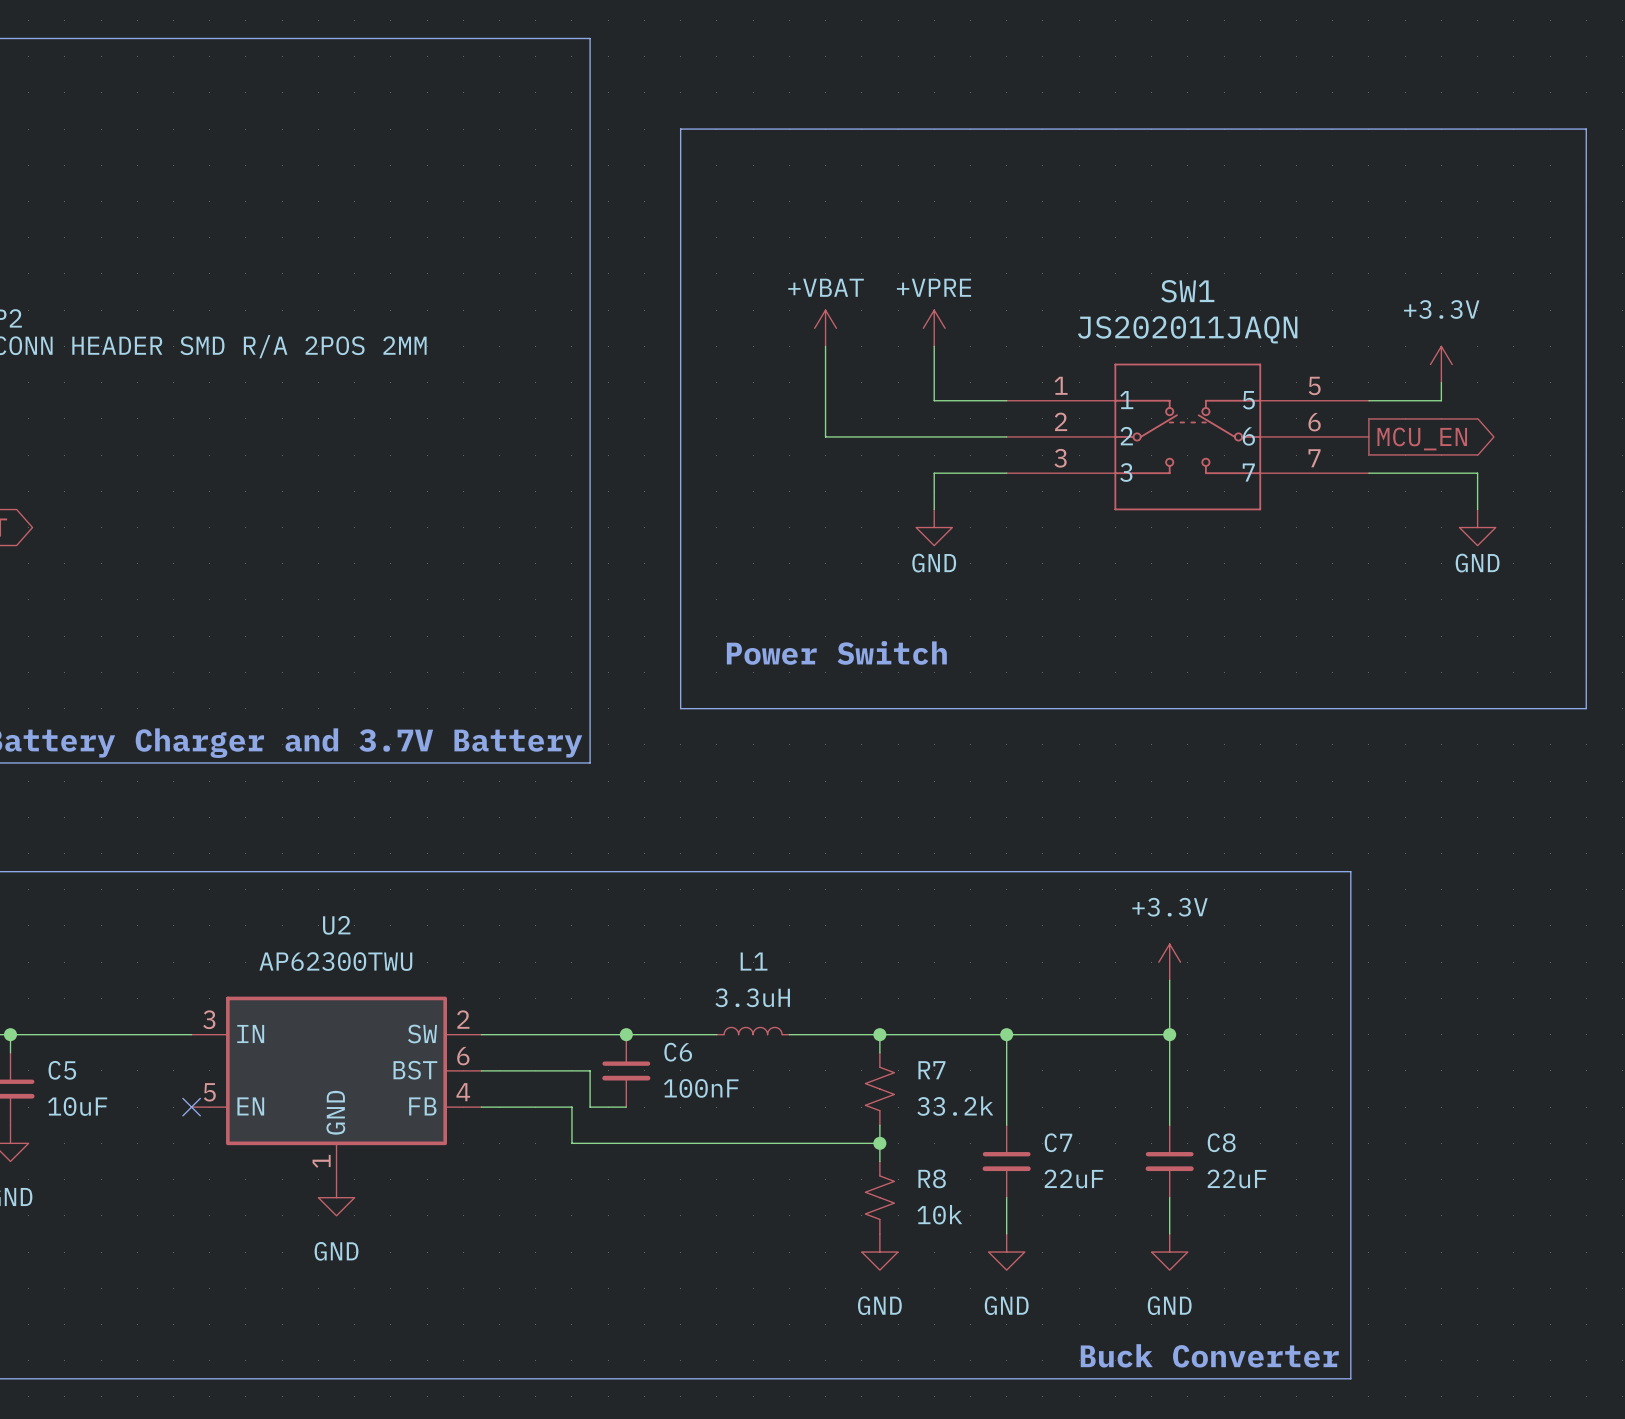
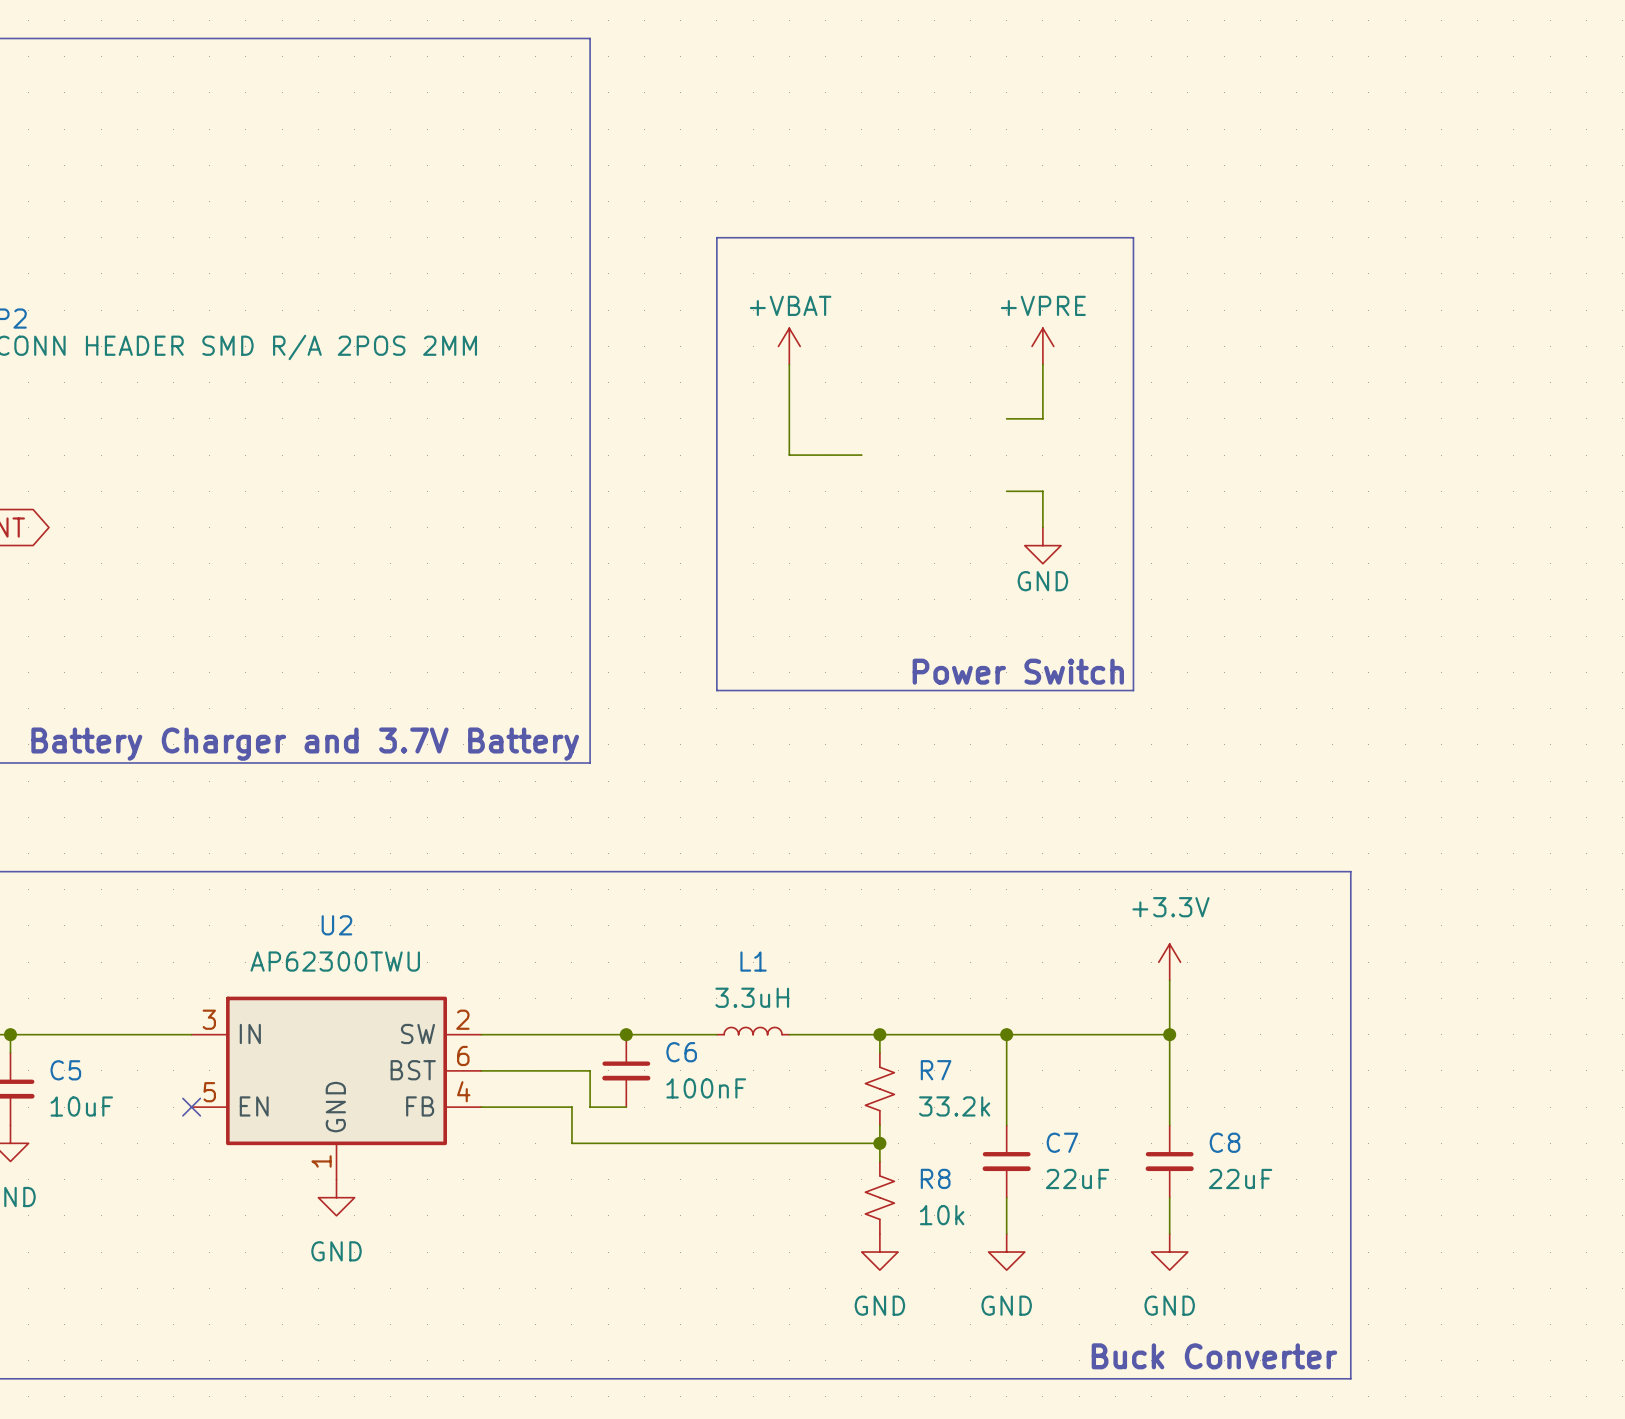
line: (680, 129) (1586, 129) (1586, 708) (680, 708) (680, 129) -> none
line: none -> (716, 237) (1133, 237) (1133, 690) (716, 690) (716, 237)
power symbol position: +VBAT (825, 328) -> +VBAT (789, 346)
power symbol position: +VPRE (934, 328) -> +VPRE (1042, 346)
wire: (825, 346) (825, 436) (1006, 436) -> none
wire: (934, 346) (934, 400) (1006, 400) -> none
wire: none -> (789, 364) (789, 455) (861, 455)
wire: none -> (1042, 364) (1042, 418) (1006, 418)
power symbol: +3.3V (1441, 364) -> none
wire: (1441, 382) (1441, 400) (1368, 400) -> none
SW1: JS202011JAQN (1187, 436) -> none
global label: MCU_EN (1422, 439) -> none
wire: (1006, 473) (934, 473) (934, 509) -> none
wire: (1368, 473) (1477, 473) (1477, 509) -> none
wire: none -> (1006, 491) (1042, 491) (1042, 527)
power symbol position: GND (934, 527) -> GND (1042, 545)
power symbol: GND (1477, 527) -> none
text position: Power Switch (836, 652) -> Power Switch (1018, 671)

